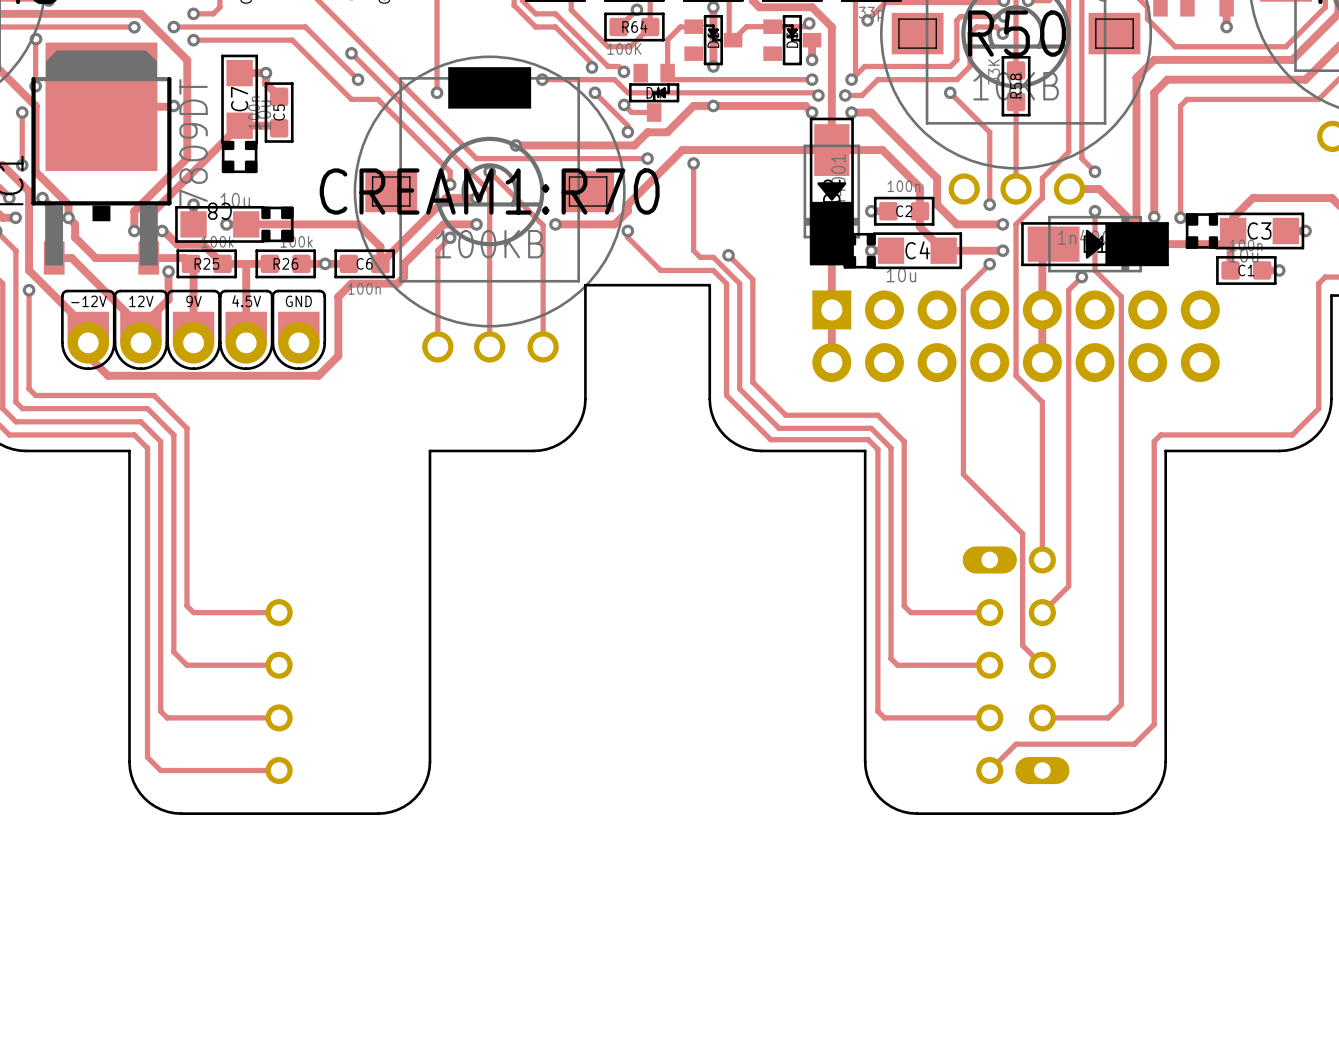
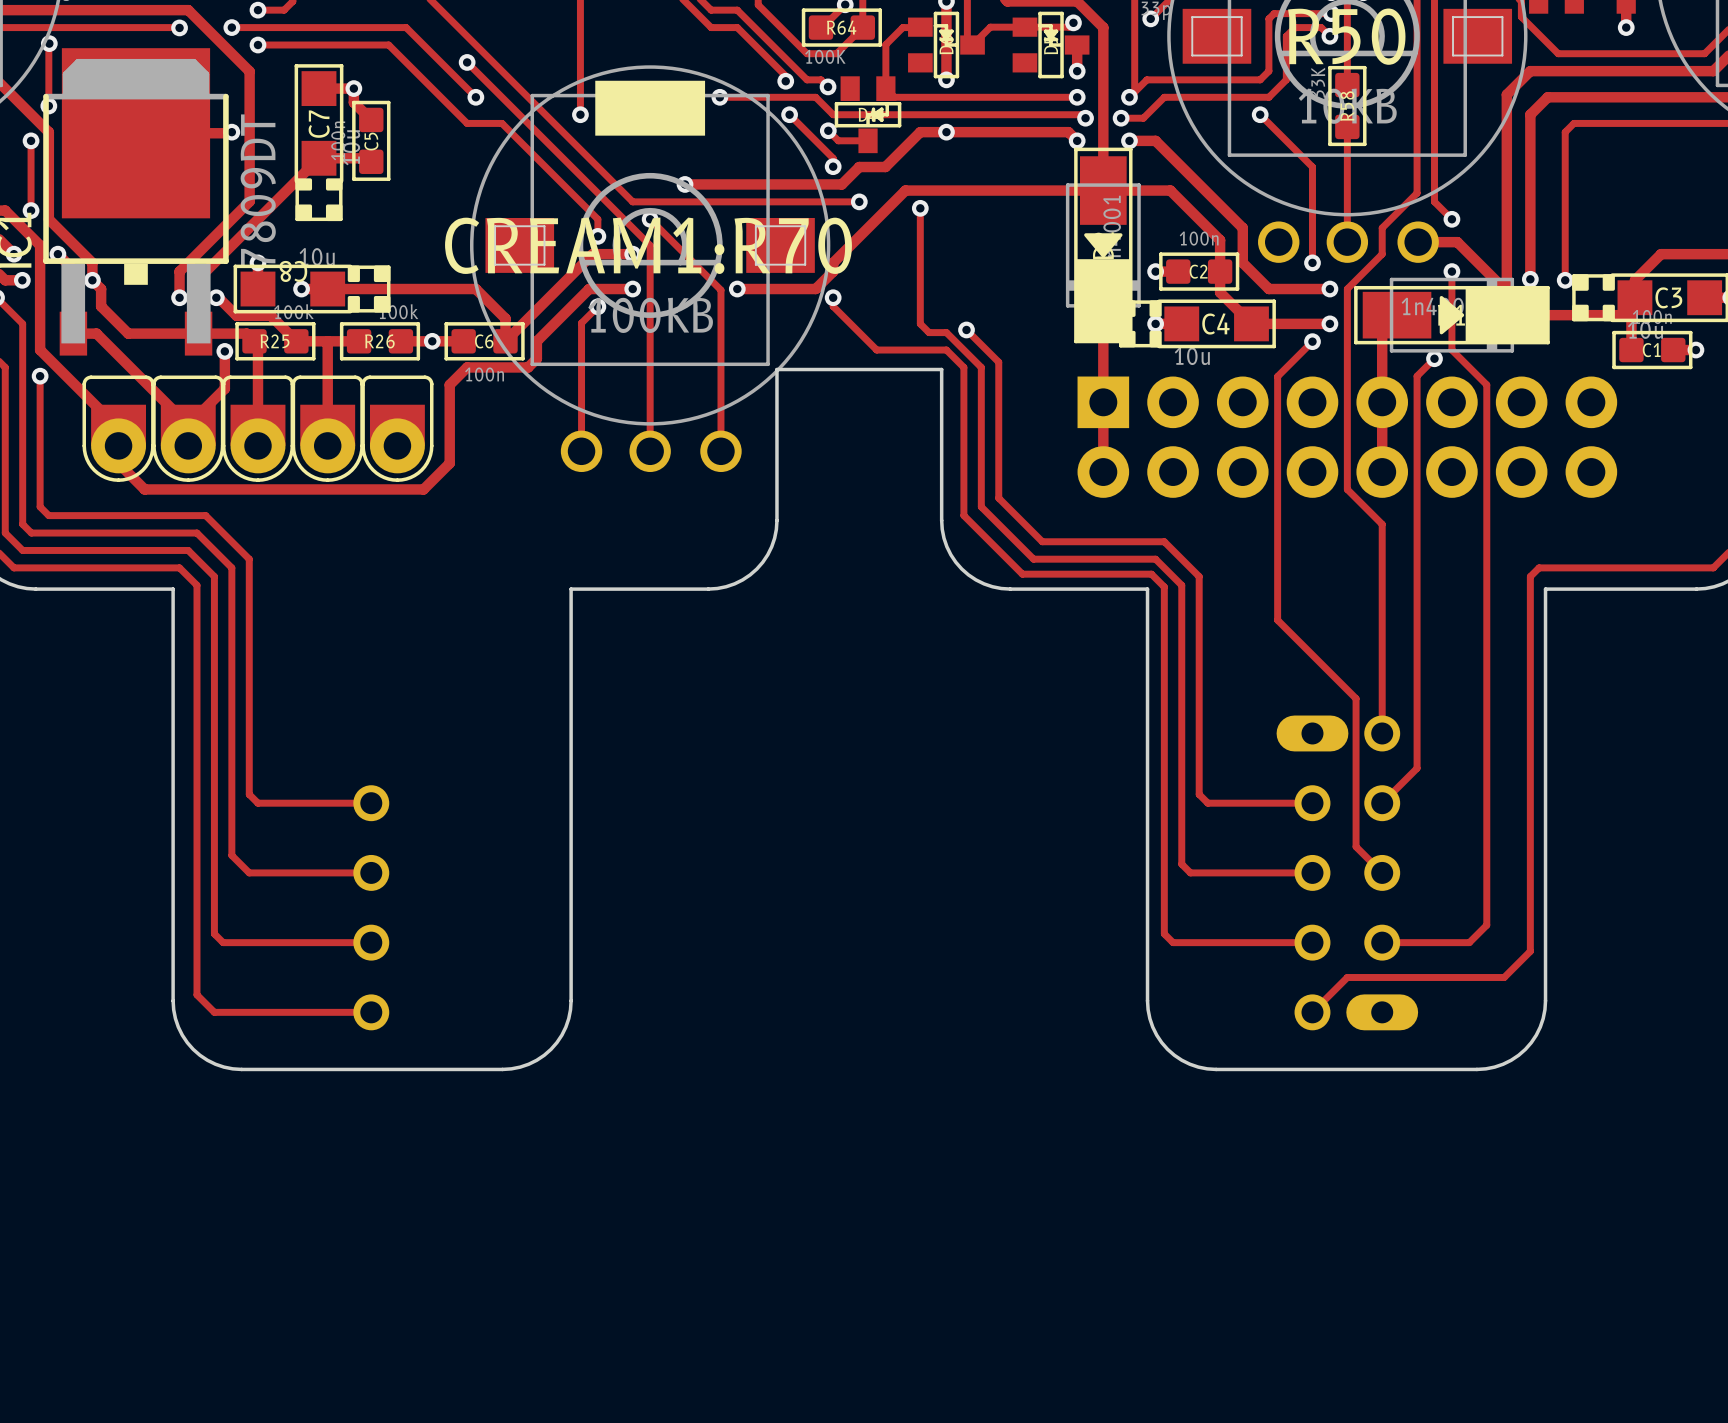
part text: -12V (88, 301) -> none
part text: 12V (141, 301) -> none
part text: 9V (194, 301) -> none
part text: 4.5V (246, 301) -> none
part text: GND (298, 301) -> none

